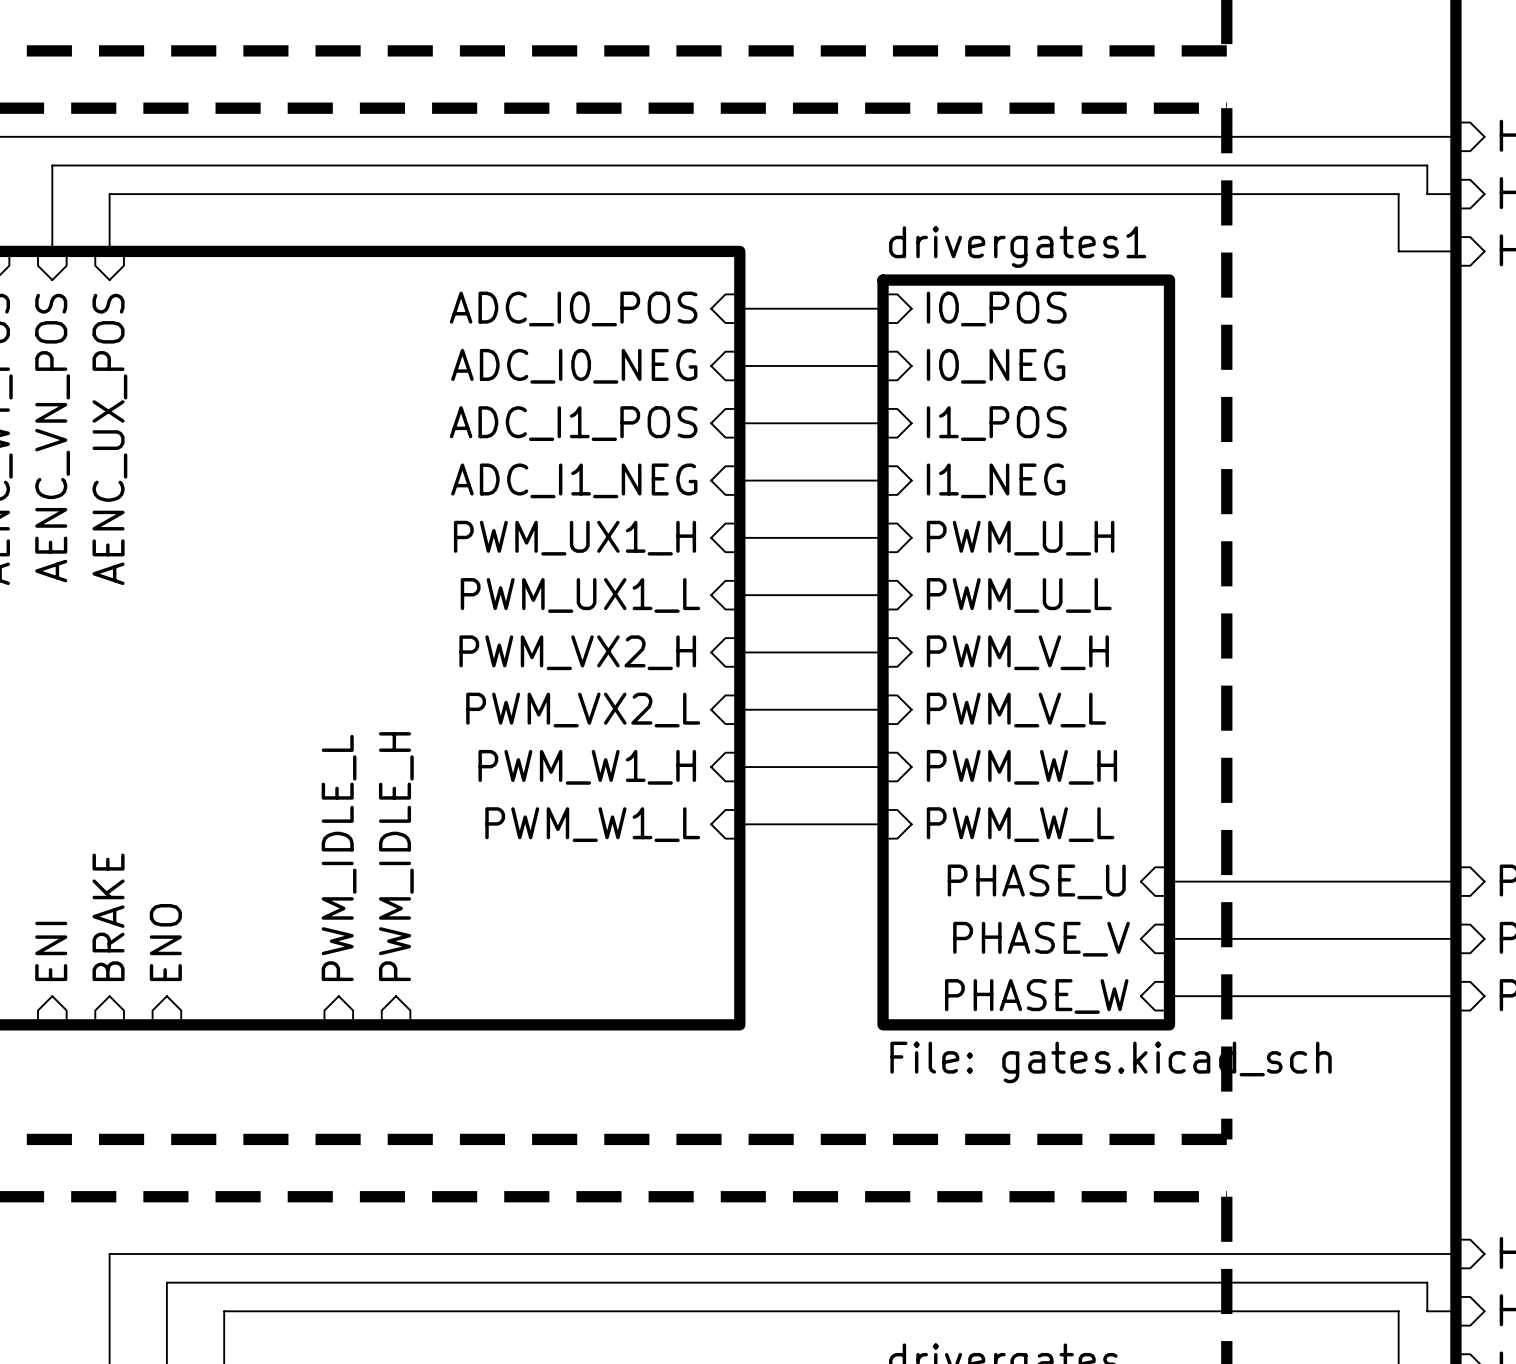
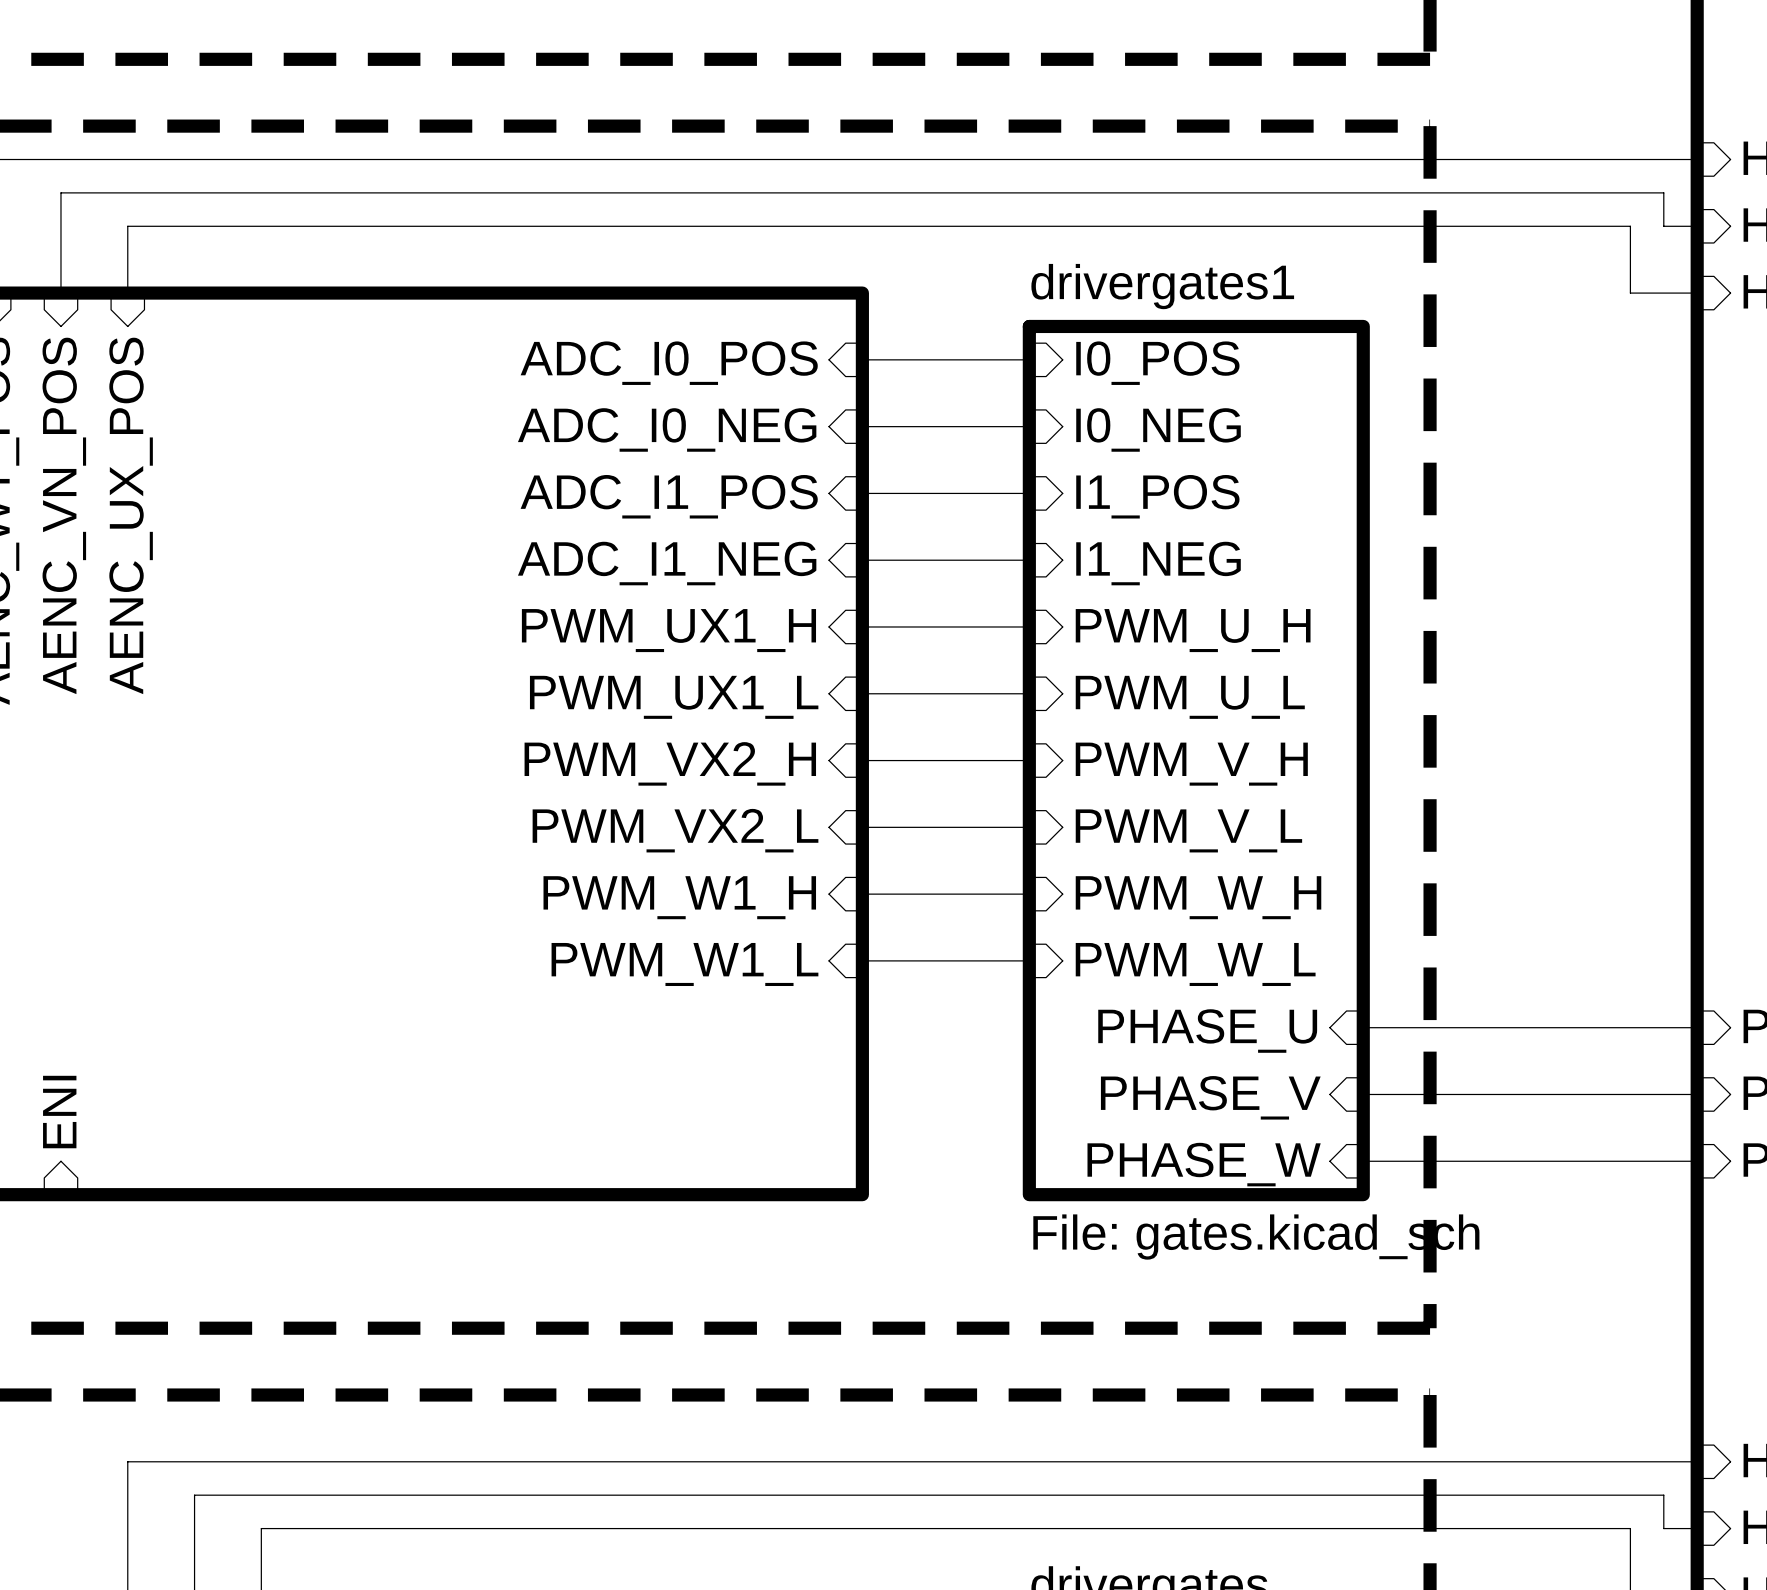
sheet pin: PWM_IDLE_H (396, 856) -> none
sheet pin: PWM_IDLE_L (339, 857) -> none
sheet pin: BRAKE (108, 917) -> none
sheet pin: ENO (165, 942) -> none

